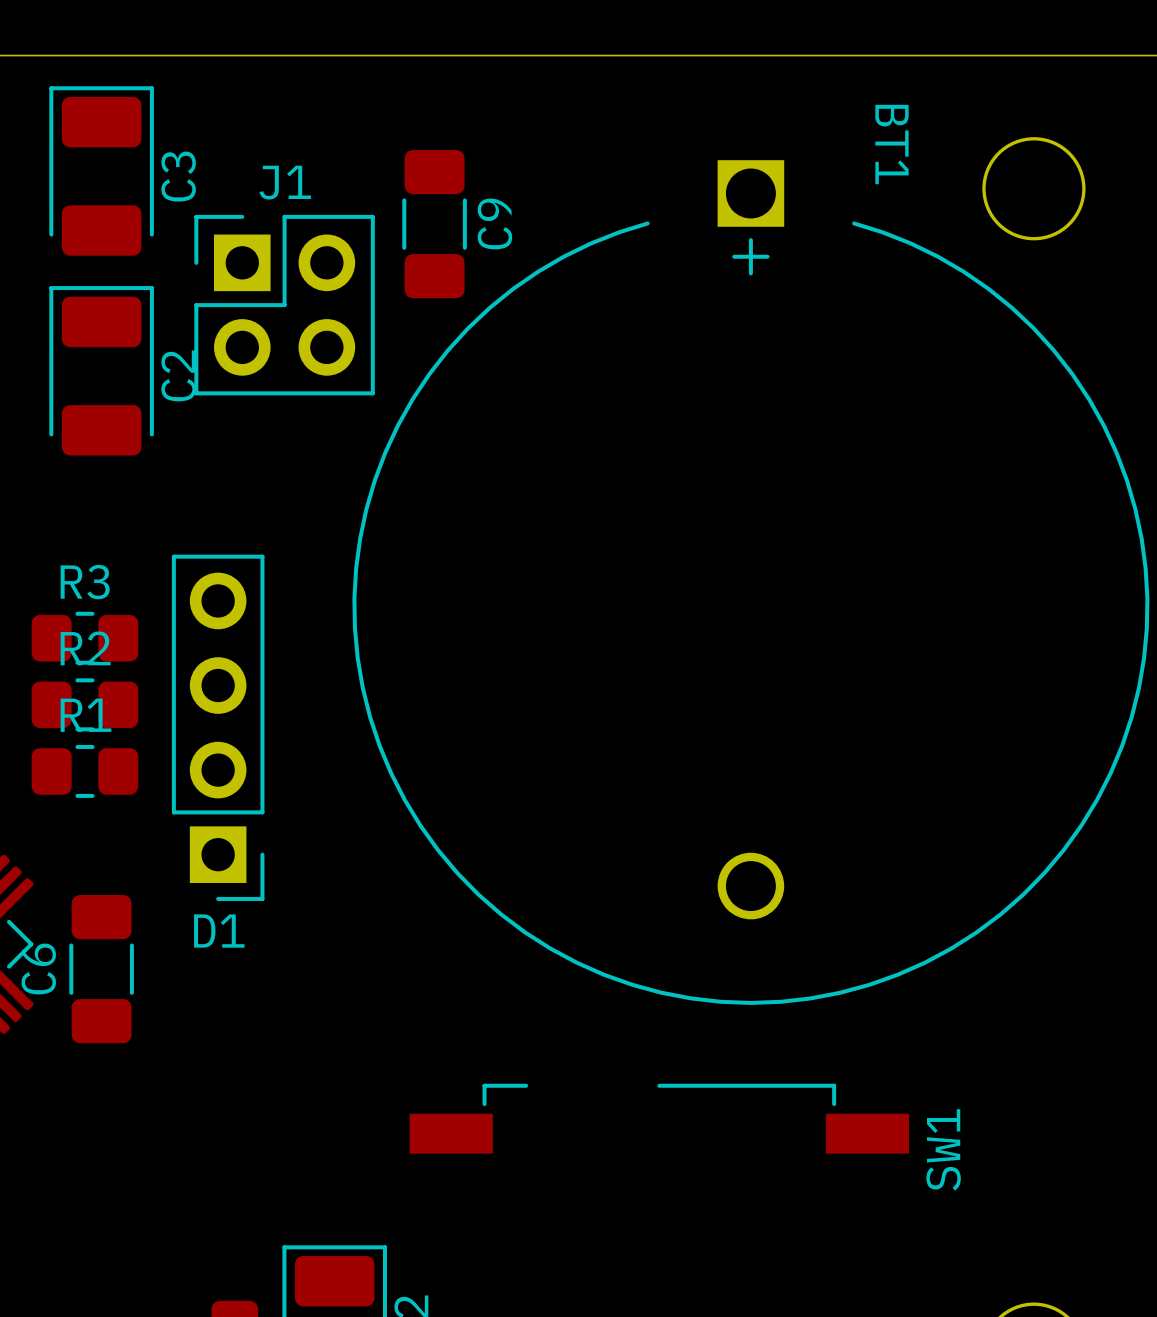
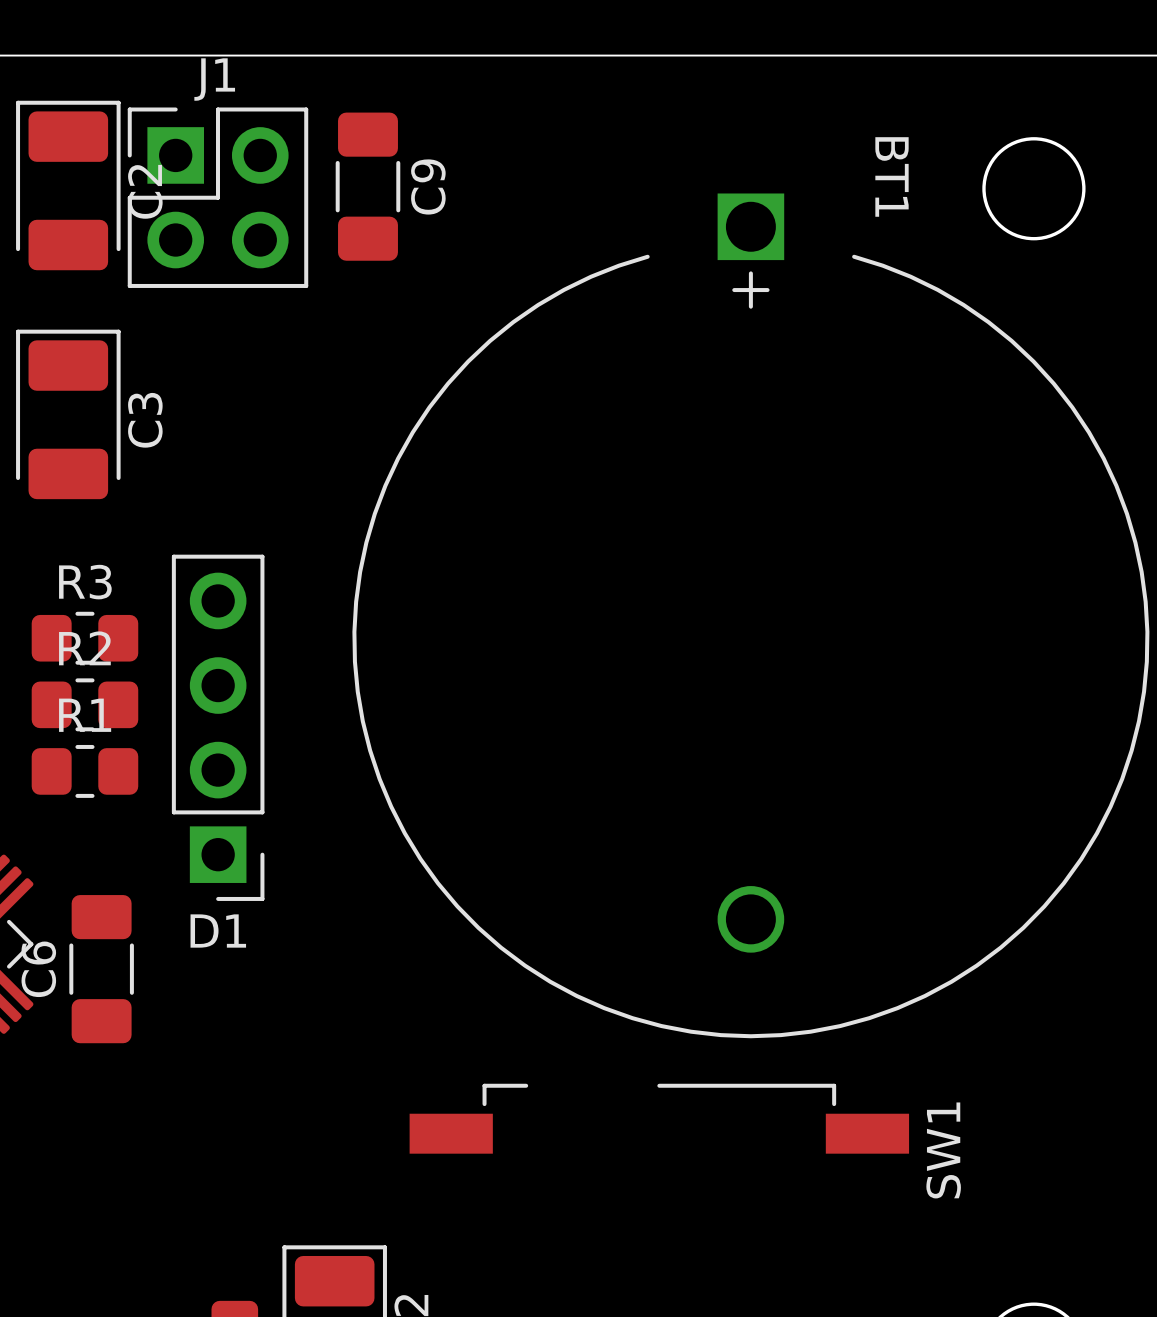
C3 position: (101, 171) -> (68, 414)
C9 position: (434, 224) -> (367, 186)
J1 position: (284, 305) -> (217, 197)
C2 position: (101, 370) -> (68, 185)
BT1 position: (750, 582) -> (750, 615)

